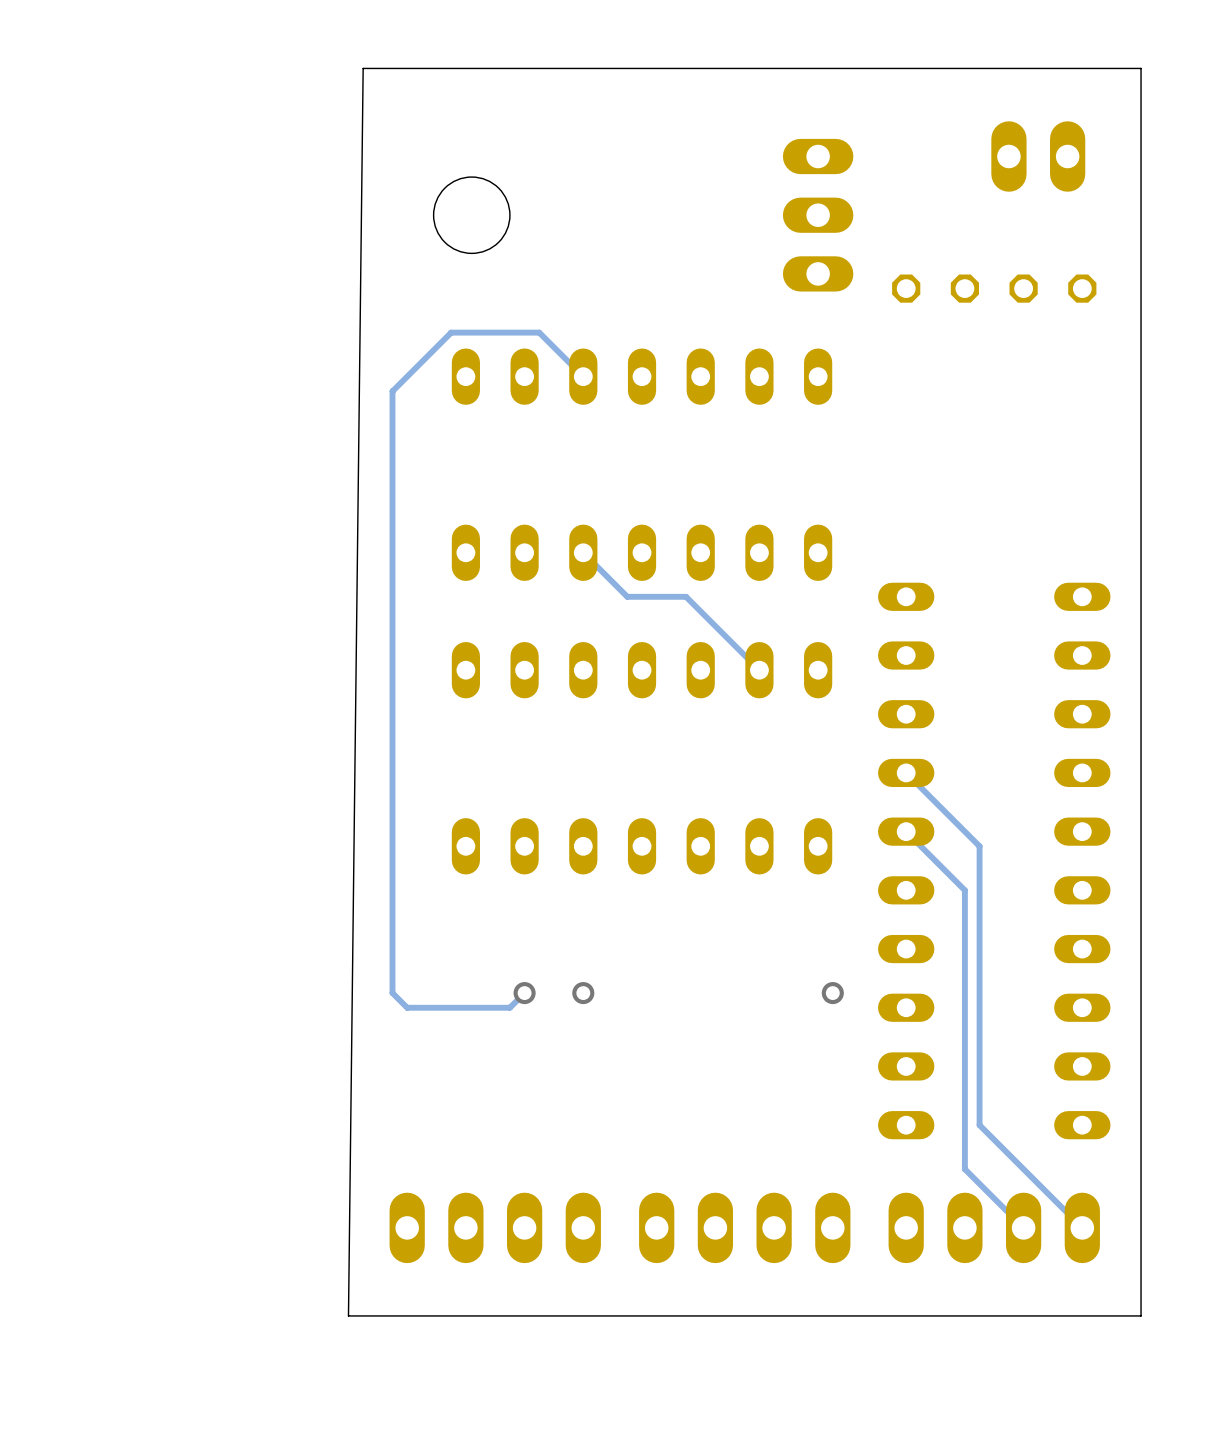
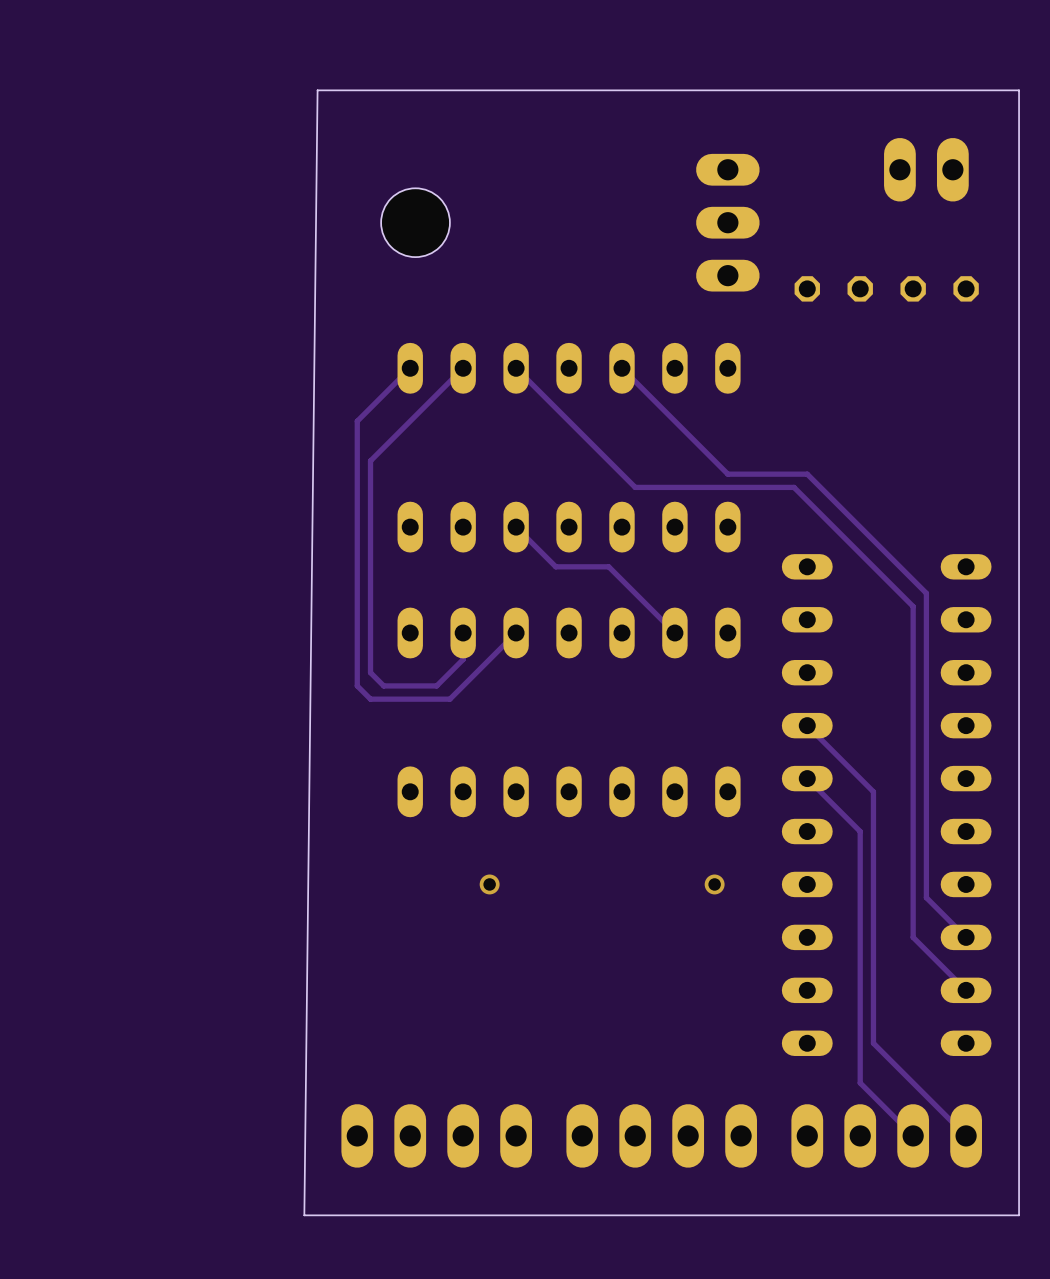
track: none -> (410, 368) (357, 421) (357, 685) (370, 699) (449, 699) (516, 632)
track: none -> (463, 368) (370, 460) (370, 672) (383, 685) (436, 685) (463, 659) (463, 632)
track: (583, 376) (539, 332) (451, 332) (392, 391) (392, 993) (407, 1007) (509, 1007) (524, 993) -> (516, 368) (635, 487) (794, 487) (913, 606) (913, 937) (966, 990)
track: none -> (621, 368) (727, 474) (807, 474) (926, 593) (926, 897) (966, 937)
via: none -> (489, 884)
via: (524, 993) -> none
via: (583, 993) -> none
via position: (832, 993) -> (714, 884)

